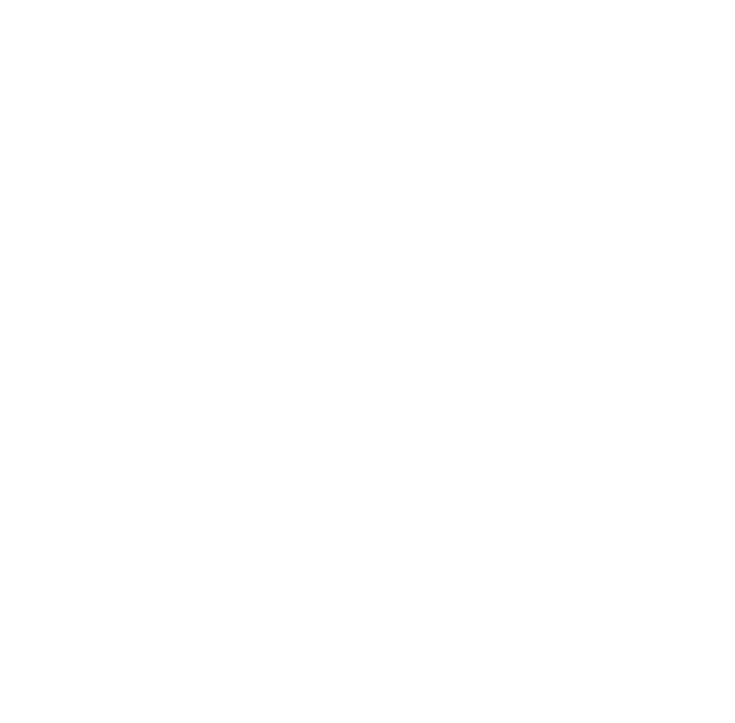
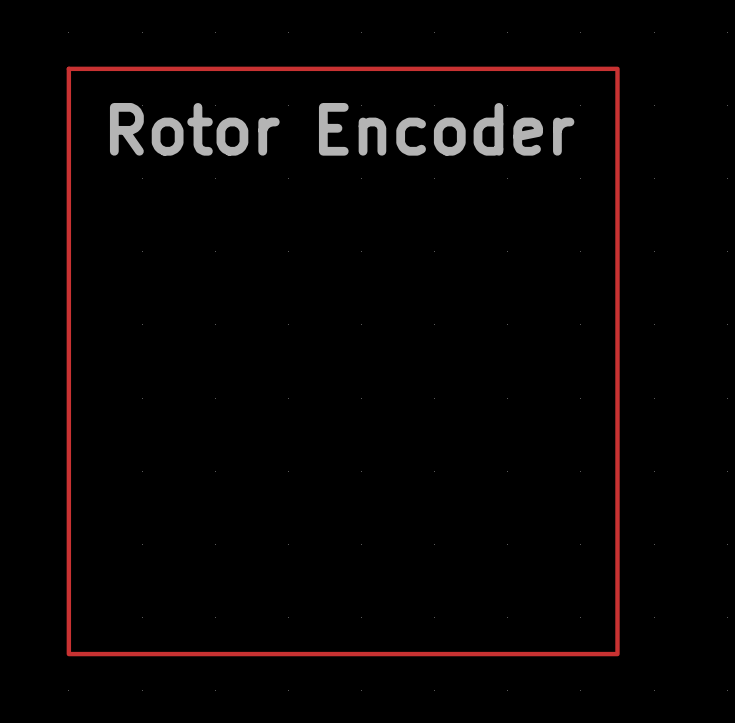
sheet Rotor Encoder: none -> (343, 361)

